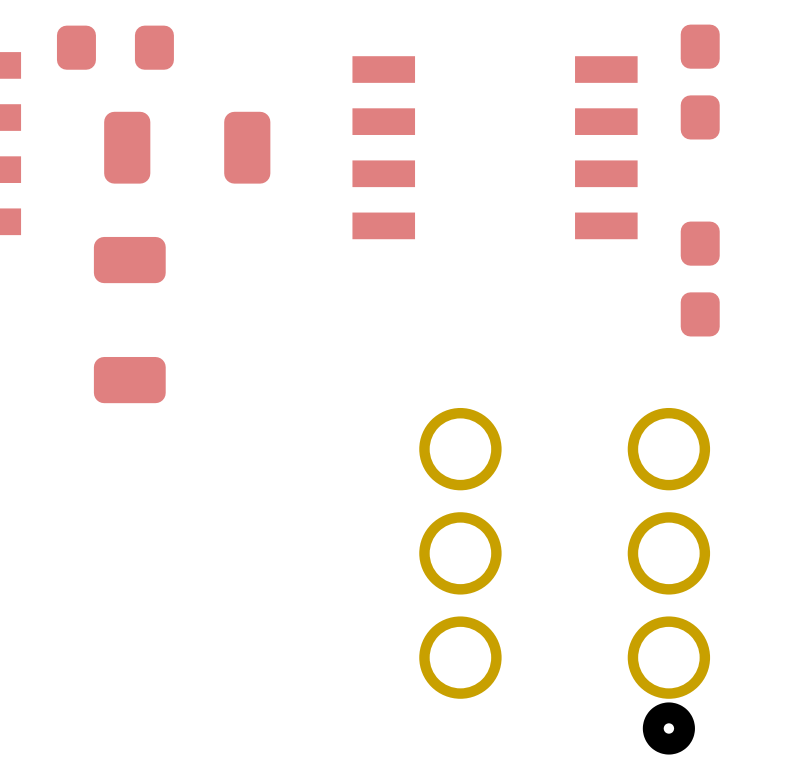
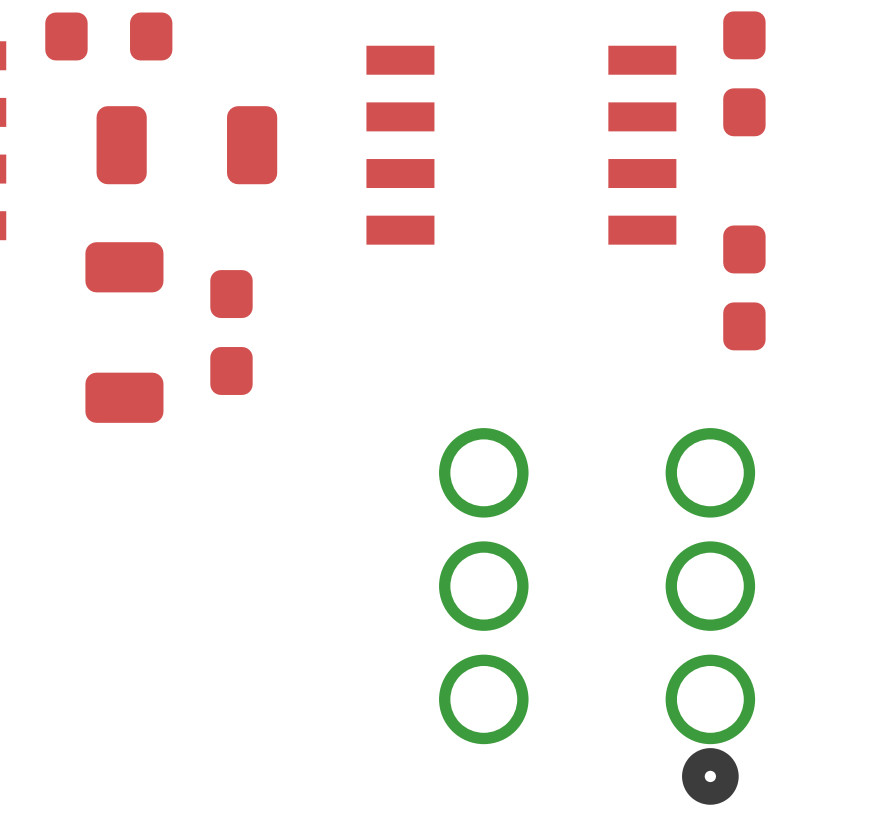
part: none -> (231, 332)

